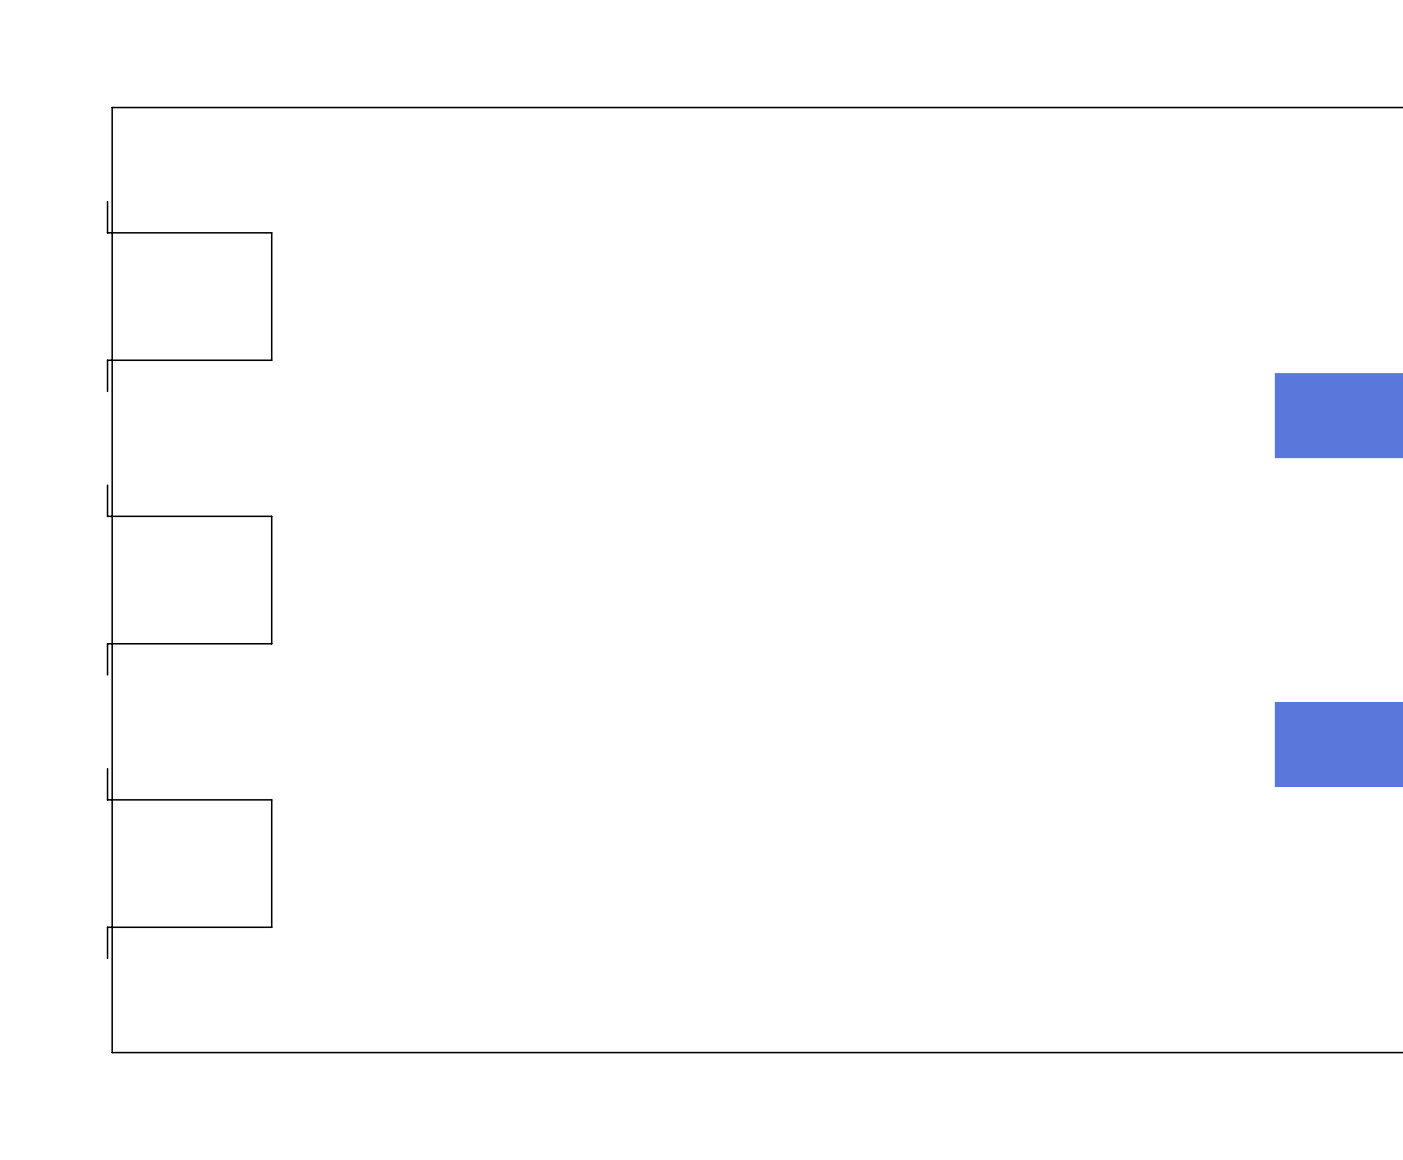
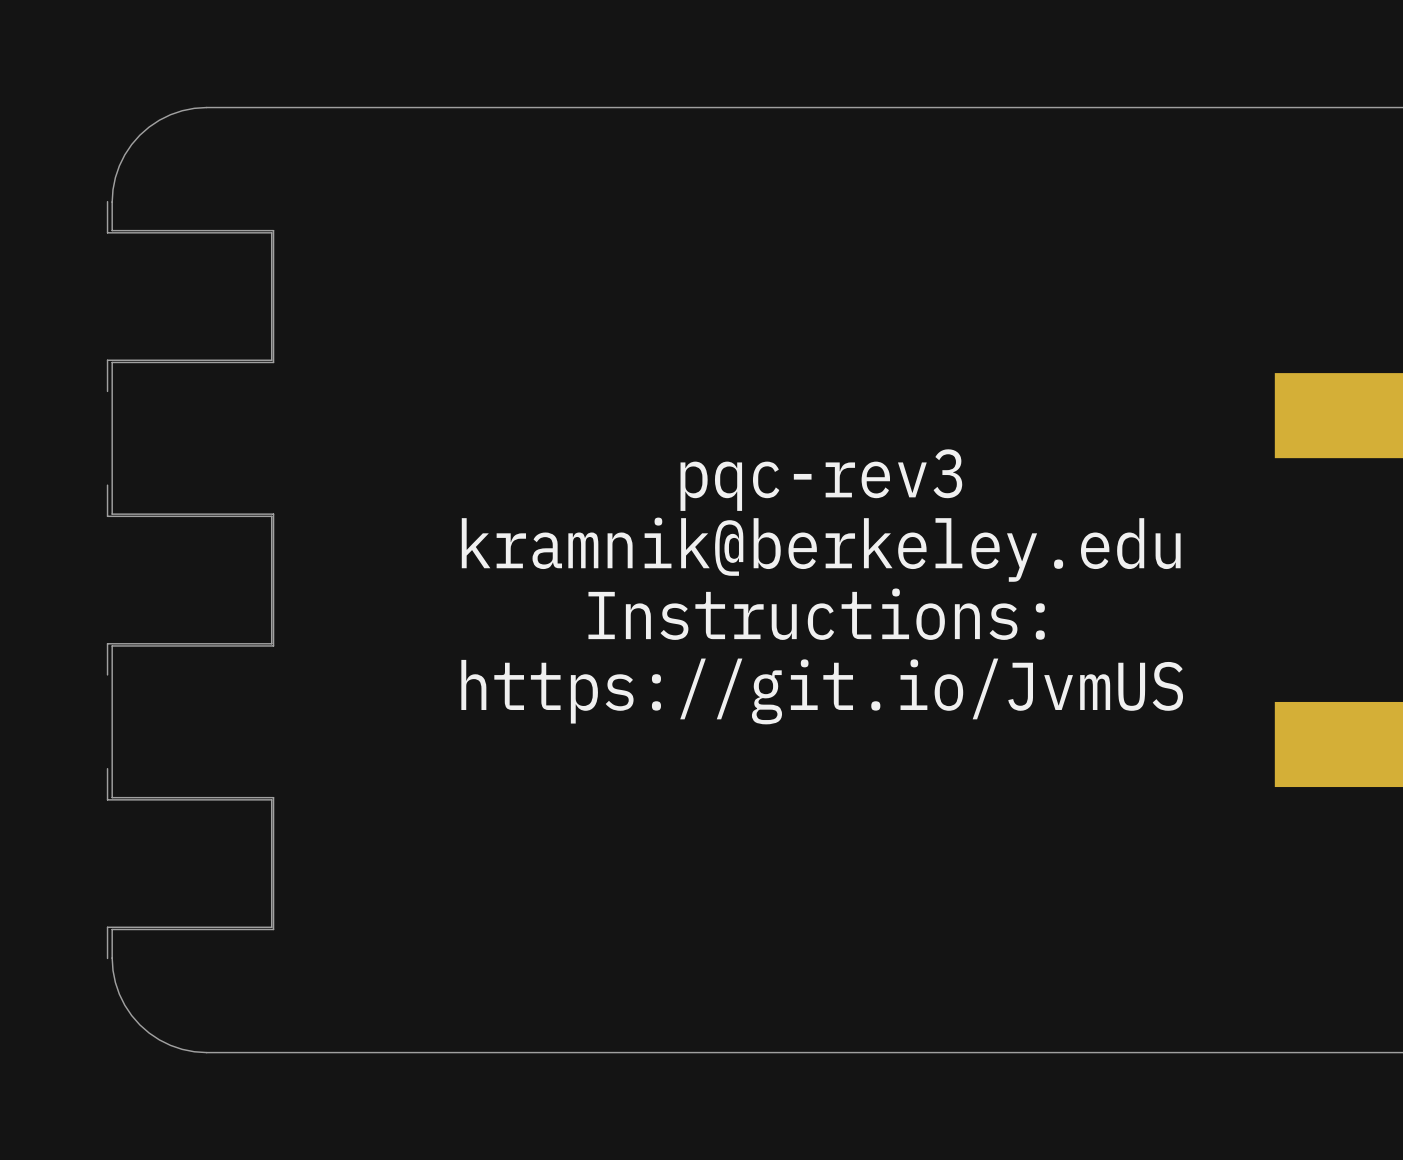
board edge: (206, 107) (112, 107) (112, 202) -> (206, 107) (182, 110) (170, 114) (149, 127) (139, 135) (131, 144) (119, 165) (115, 177) (112, 202)
board edge: (112, 230) (112, 362) -> (112, 230) (273, 230) (273, 362) (112, 362)
text: none -> pqc-rev3 (821, 480)
board edge: (112, 514) (112, 645) -> (112, 514) (273, 514) (273, 645) (112, 645)
text: none -> kramnik@berkeley.edu (821, 549)
text: none -> Instructions: (816, 614)
text: none -> https://git.io/JvmUS (822, 691)
board edge: (112, 797) (112, 929) -> (112, 797) (273, 797) (273, 929) (112, 929)
board edge: (112, 958) (112, 1052) (206, 1052) -> (112, 958) (115, 982) (119, 994) (131, 1015) (139, 1024) (149, 1033) (170, 1045) (182, 1049) (206, 1052)

